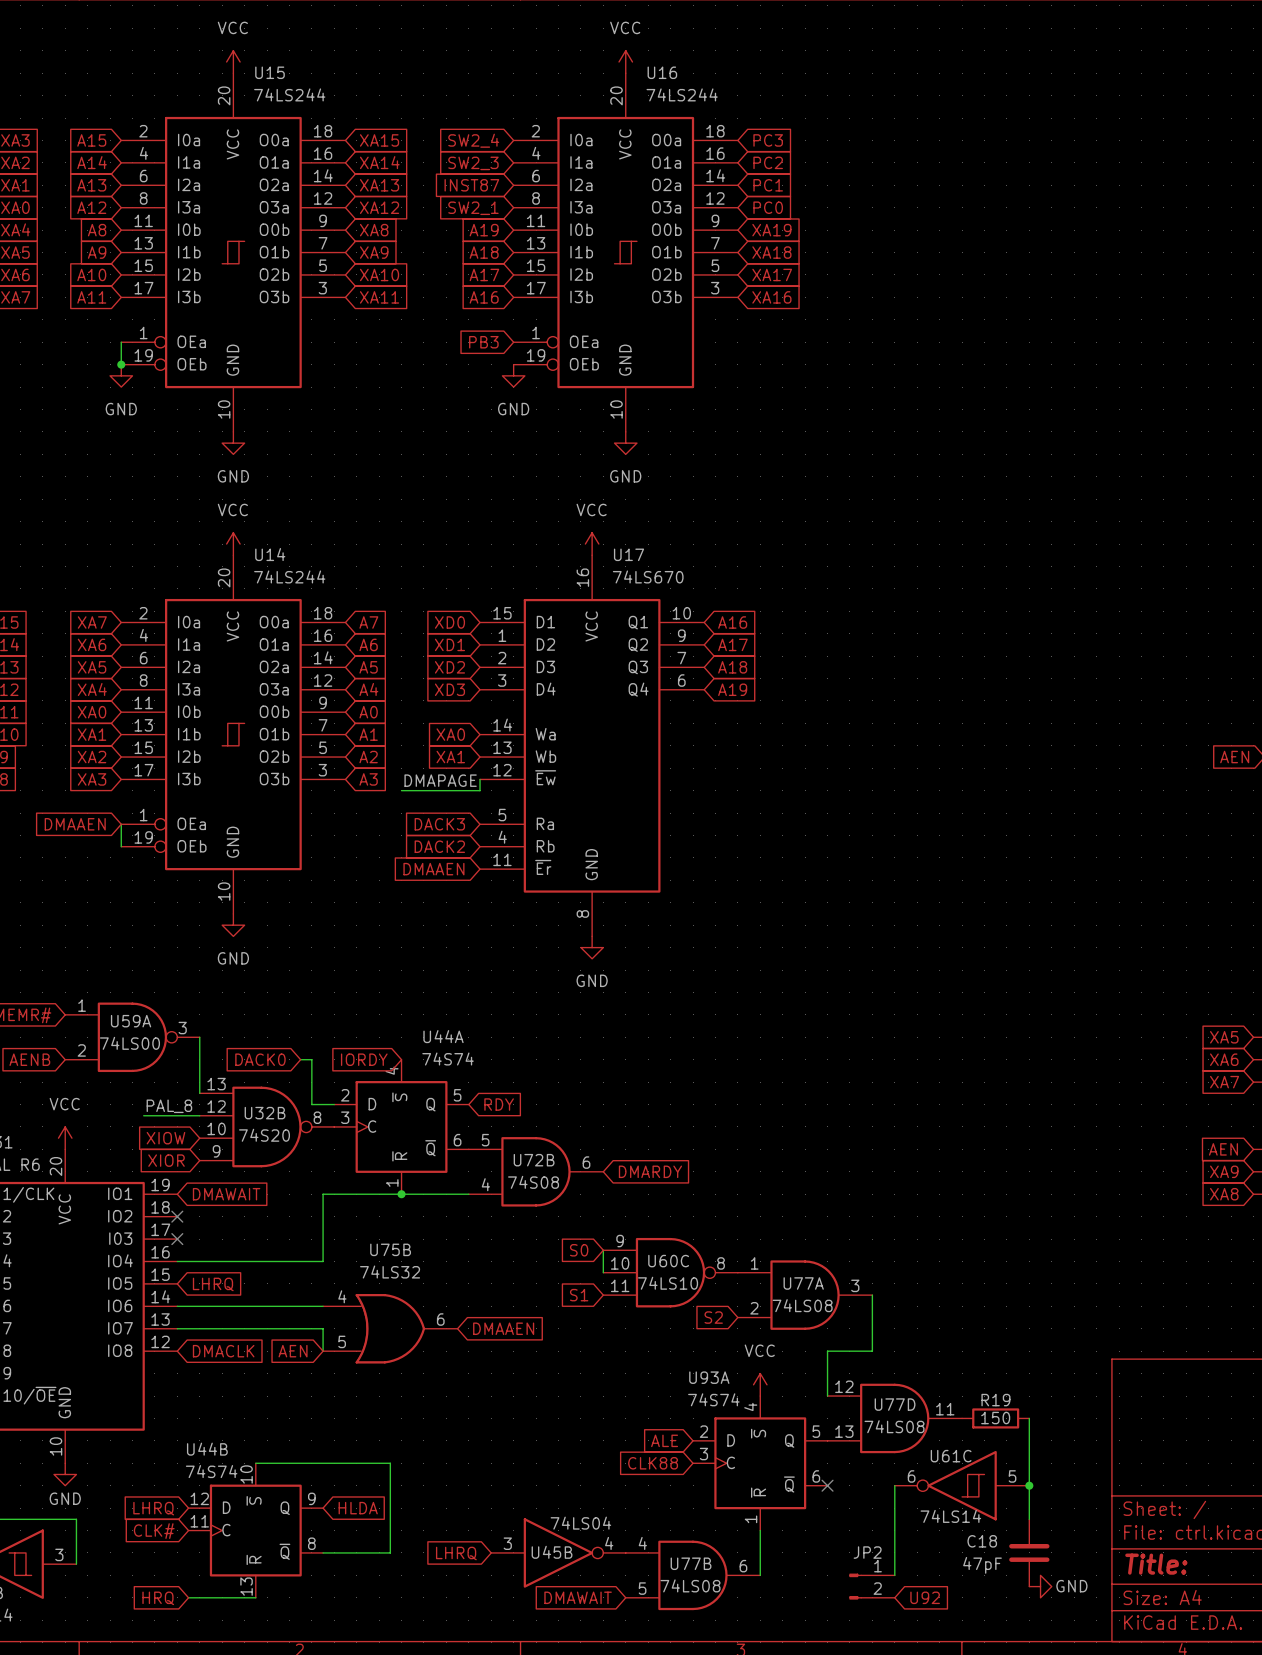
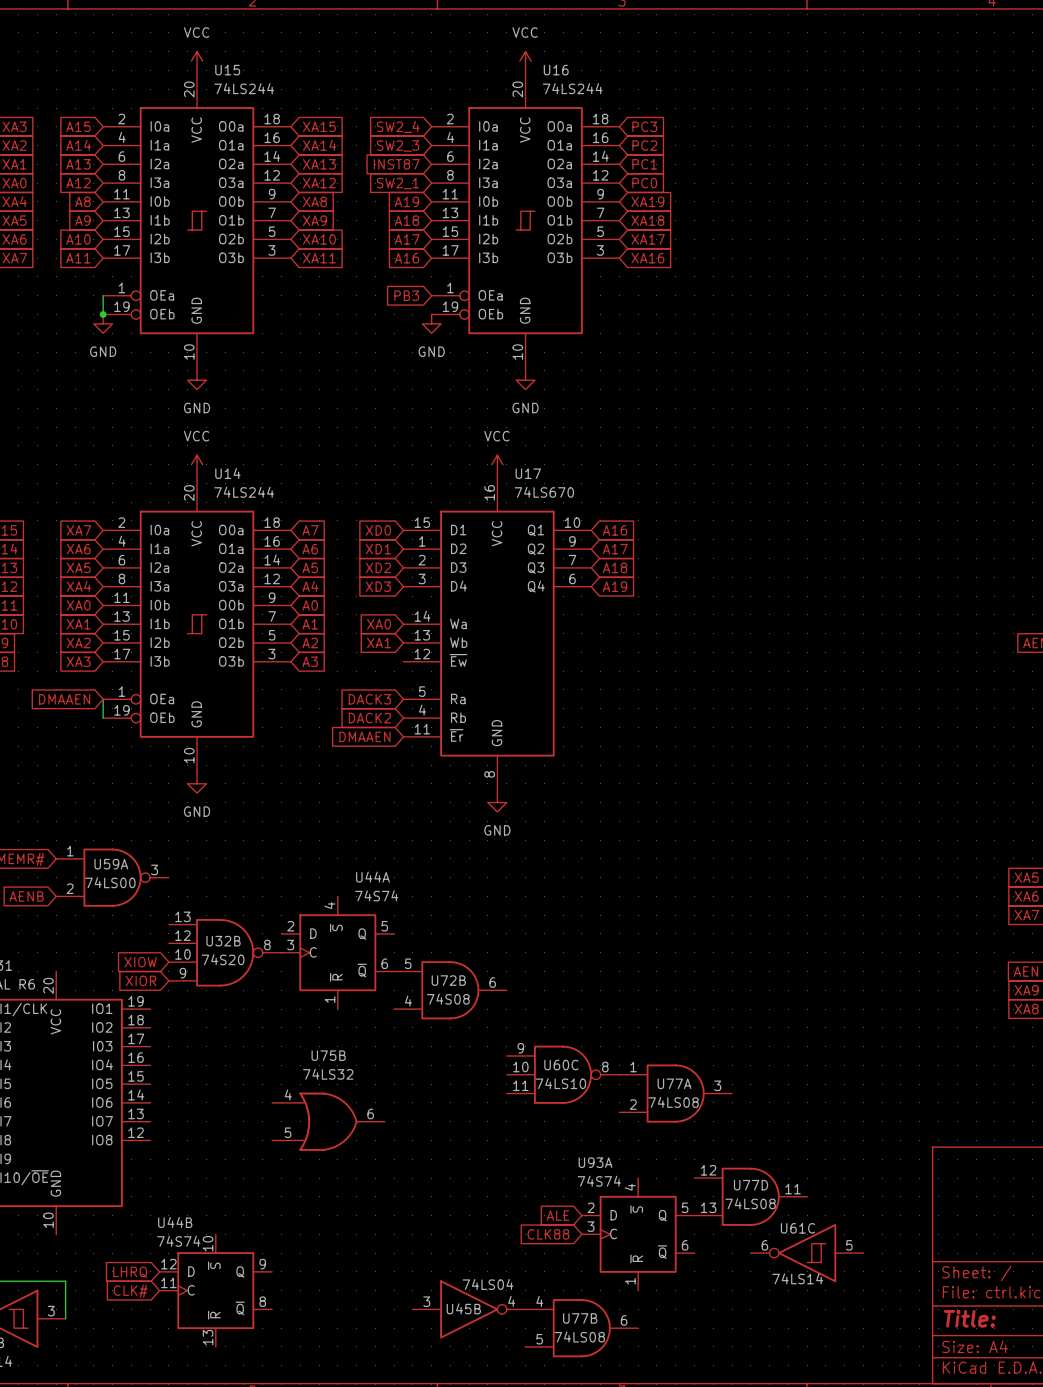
wire: (480, 779) (480, 790) (401, 790) -> none
label: DMAPAGE (440, 780) -> none
wire: (199, 1037) (199, 1093) -> none
global label: DACK0 (260, 1059) -> none
wire: (300, 1059) (311, 1059) (311, 1104) (334, 1104) -> none
global label: IORDY (364, 1059) -> none
global label: RDY (499, 1104) -> none
label: PAL_8 (169, 1106) -> none
wire: (143, 1115) (199, 1115) -> none
power symbol: VCC (65, 1138) -> none
global label: DMARDY (650, 1171) -> none
global label: DMAWAIT (226, 1194) -> none
junction: (401, 1194) -> none
wire: (468, 1194) (323, 1194) (323, 1261) (177, 1261) -> none
no-connect mark: (177, 1216) -> none
no-connect mark: (177, 1239) -> none
global label: S0 (579, 1250) -> none
wire: (603, 1250) (603, 1272) -> none
global label: LHRQ (213, 1284) -> none
global label: S1 (579, 1295) -> none
wire: (872, 1295) (872, 1351) (827, 1351) (827, 1396) -> none
wire: (177, 1306) (323, 1306) -> none
global label: S2 (713, 1317) -> none
wire: (177, 1328) (323, 1328) (323, 1351) -> none
global label: DMAAEN (503, 1328) -> none
global label: DMACLK (223, 1351) -> none
global label: AEN (293, 1351) -> none
power symbol: VCC (760, 1384) -> none
R19: 150 (995, 1418) -> none
wire: (1029, 1418) (1029, 1519) -> none
wire: (255, 1463) (390, 1463) (390, 1552) (323, 1552) -> none
power symbol: GND (65, 1474) -> none
no-connect mark: (827, 1485) -> none
wire: (894, 1485) (894, 1575) -> none
junction: (1029, 1485) -> none
global label: HLDA (358, 1508) -> none
wire: (760, 1530) (760, 1575) -> none
C18: 47pF (1029, 1552) -> none
global label: LHRQ (456, 1553) -> none
JP2: (872, 1586) -> none
power symbol: GND (1040, 1586) -> none
wire: (188, 1597) (255, 1597) -> none
global label: DMAWAIT (578, 1597) -> none
global label: U92 (925, 1597) -> none
global label: HRQ (158, 1598) -> none

